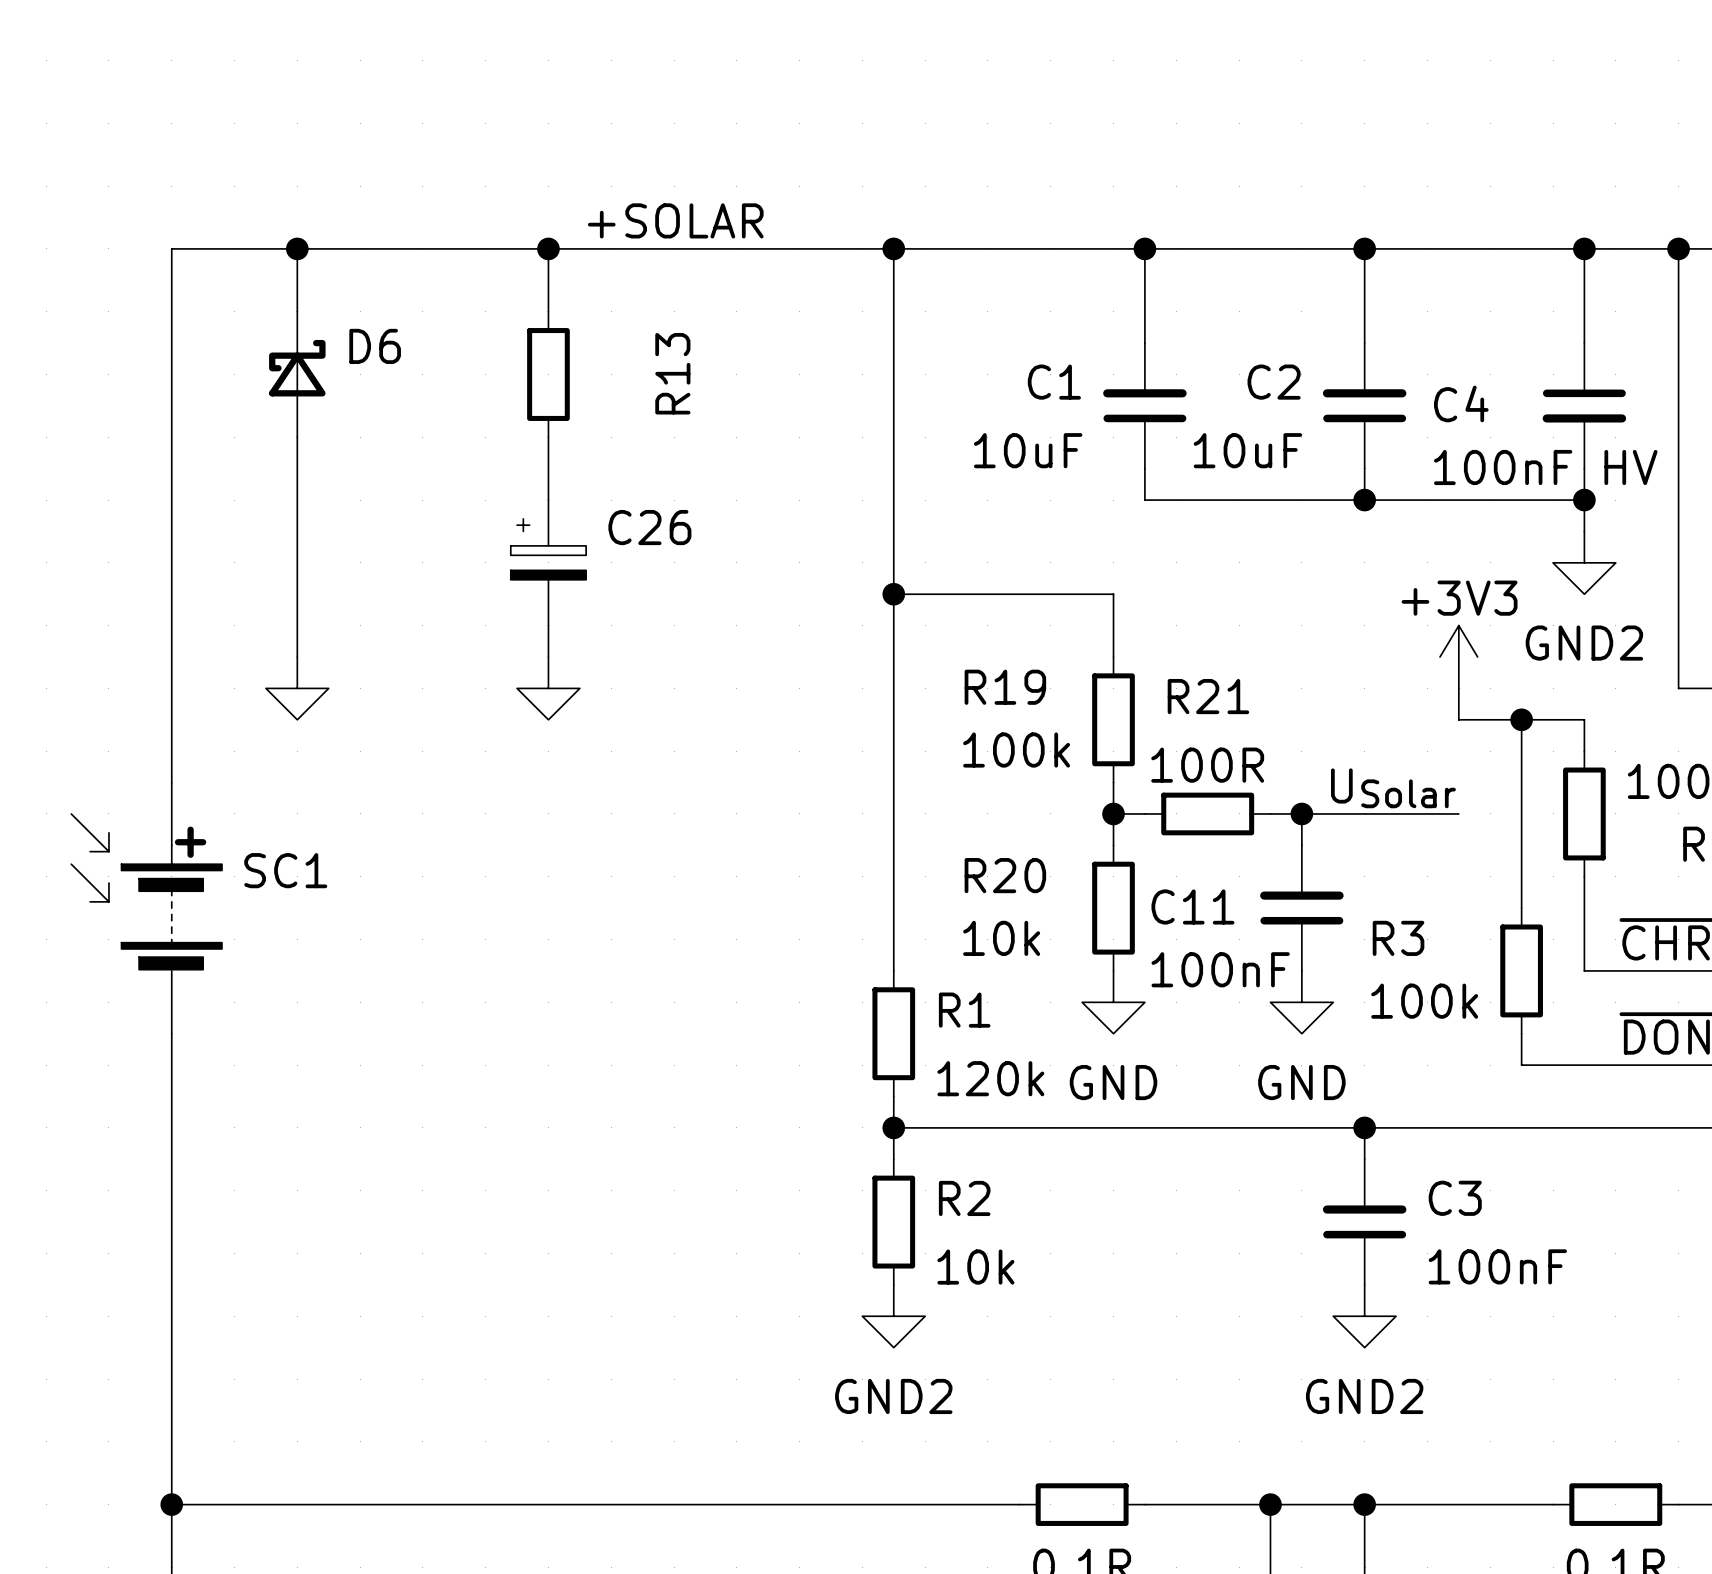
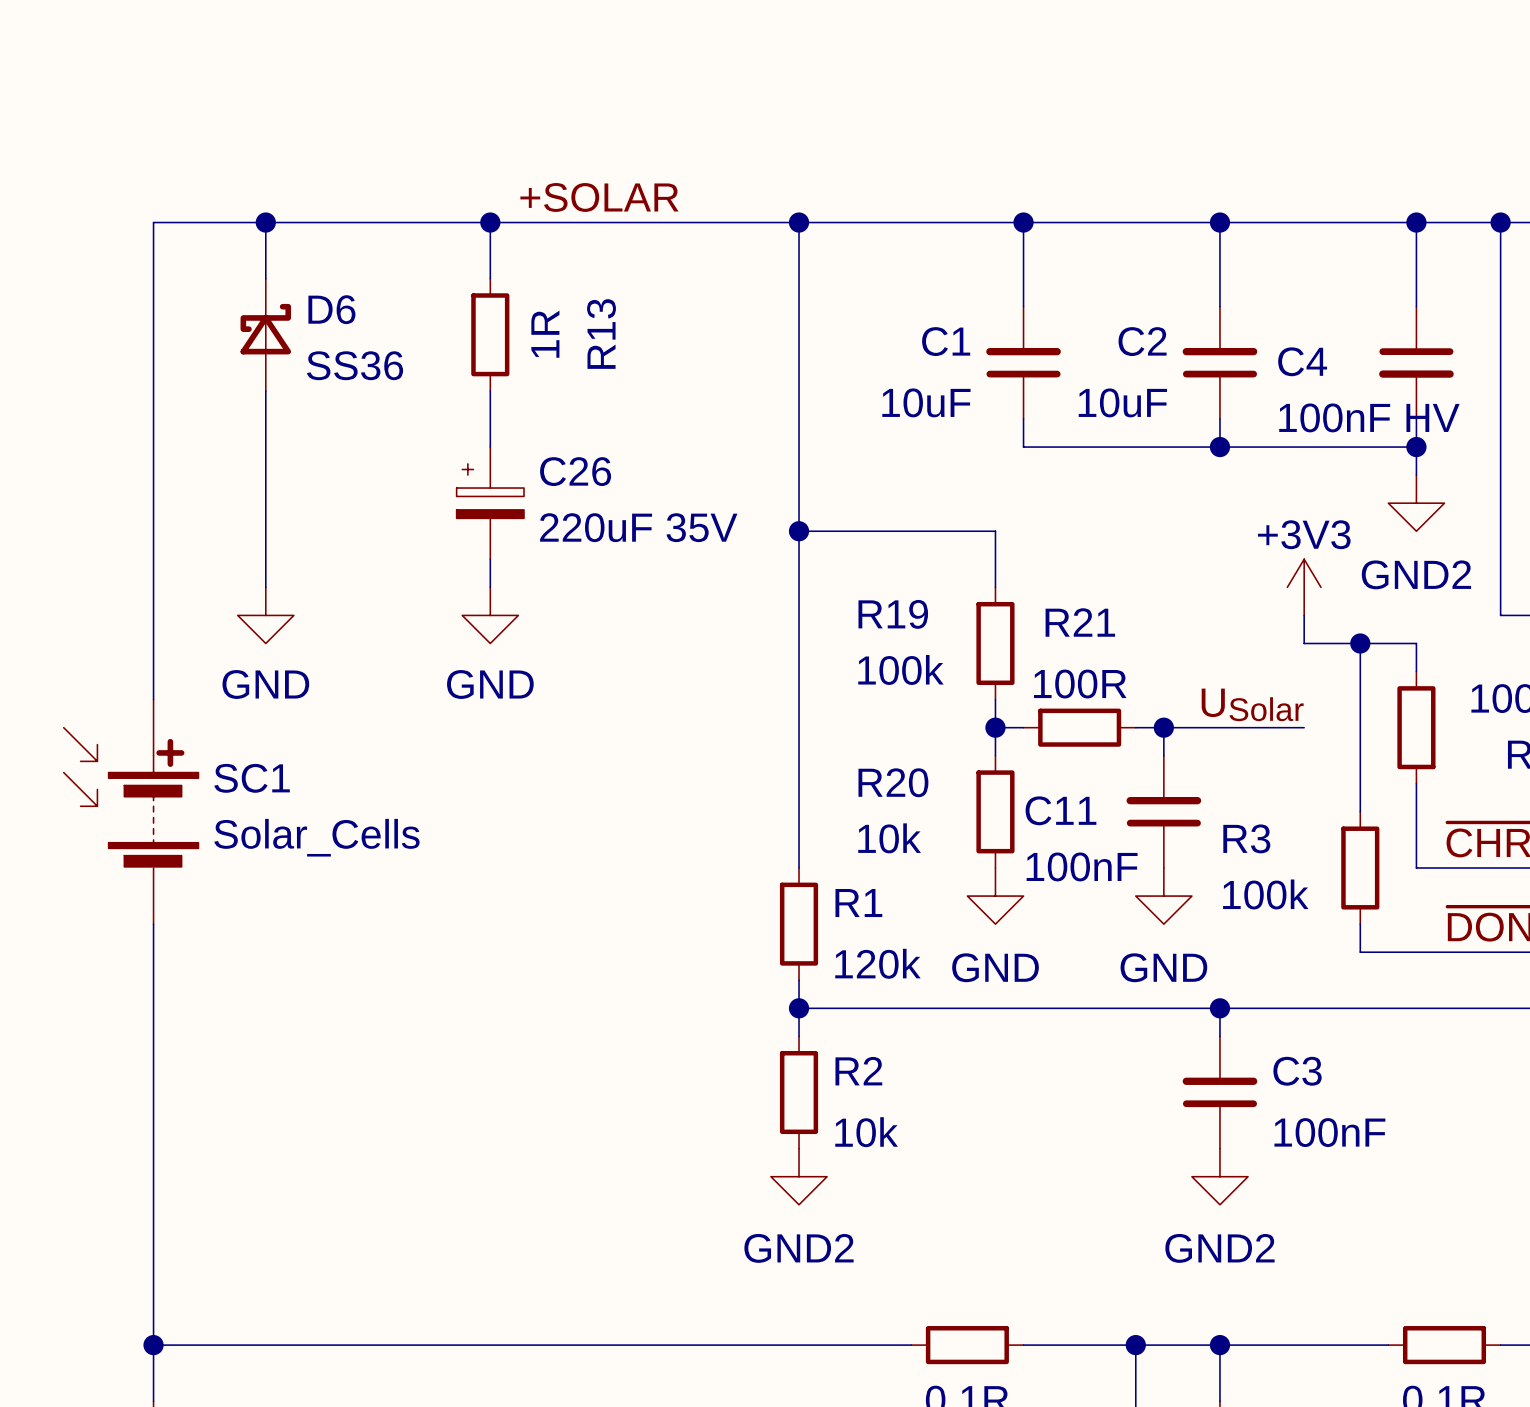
R13 value: none -> 1R (545, 334)
D6 value: none -> SS36 (355, 365)
C26 value: none -> 220uF 35V (638, 527)
power symbol text: none -> GND (265, 684)
power symbol text: none -> GND (490, 684)
SC1 value: none -> Solar_Cells (316, 837)

